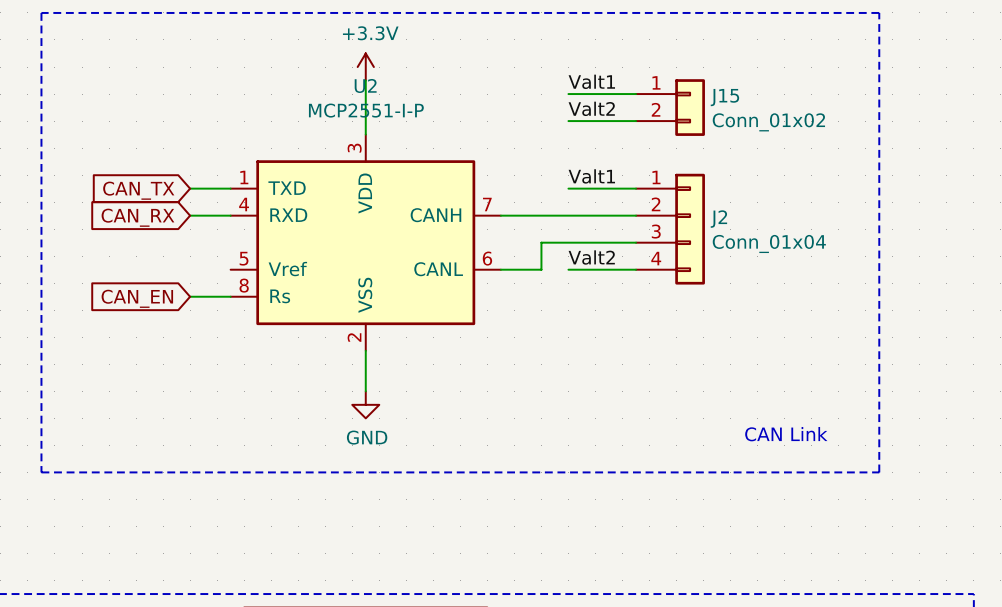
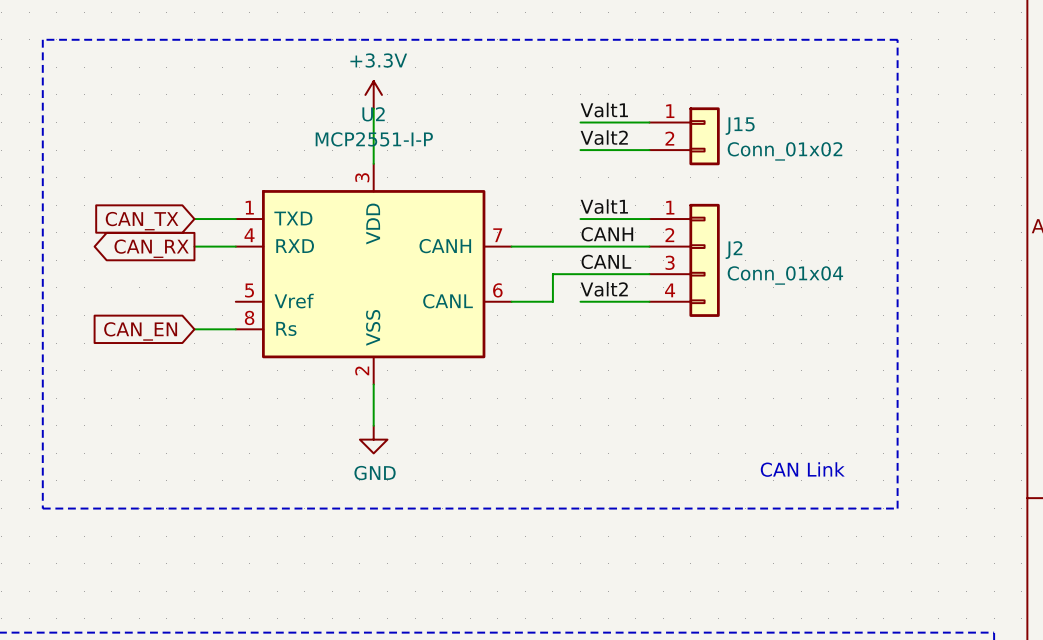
label: none -> CANH (607, 234)
global label shape: input (137, 217) -> output (151, 248)
label: none -> CANL (606, 261)

